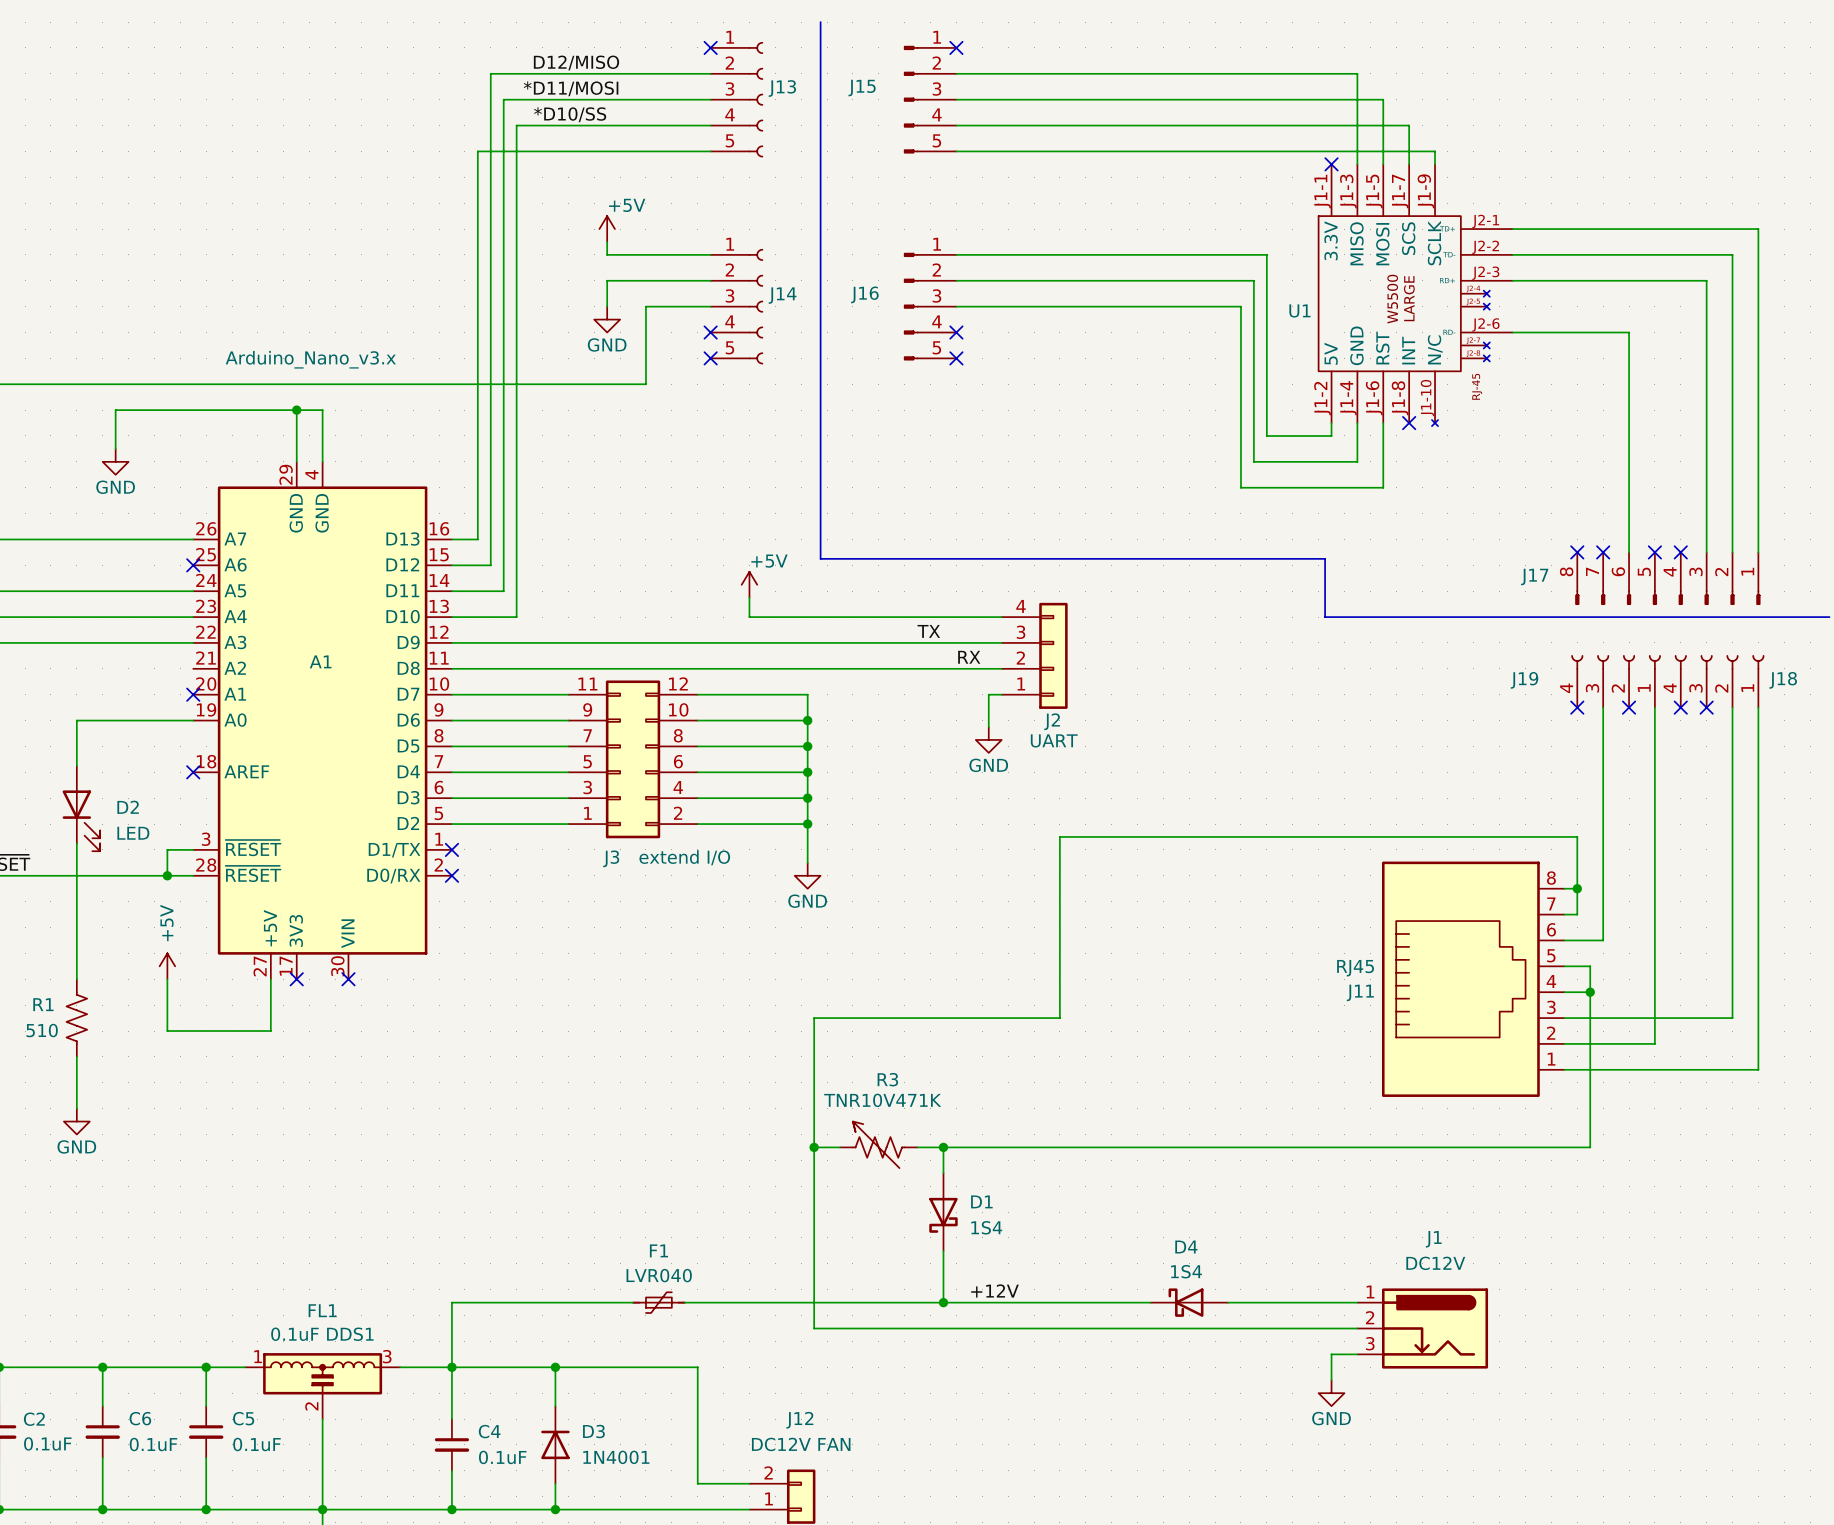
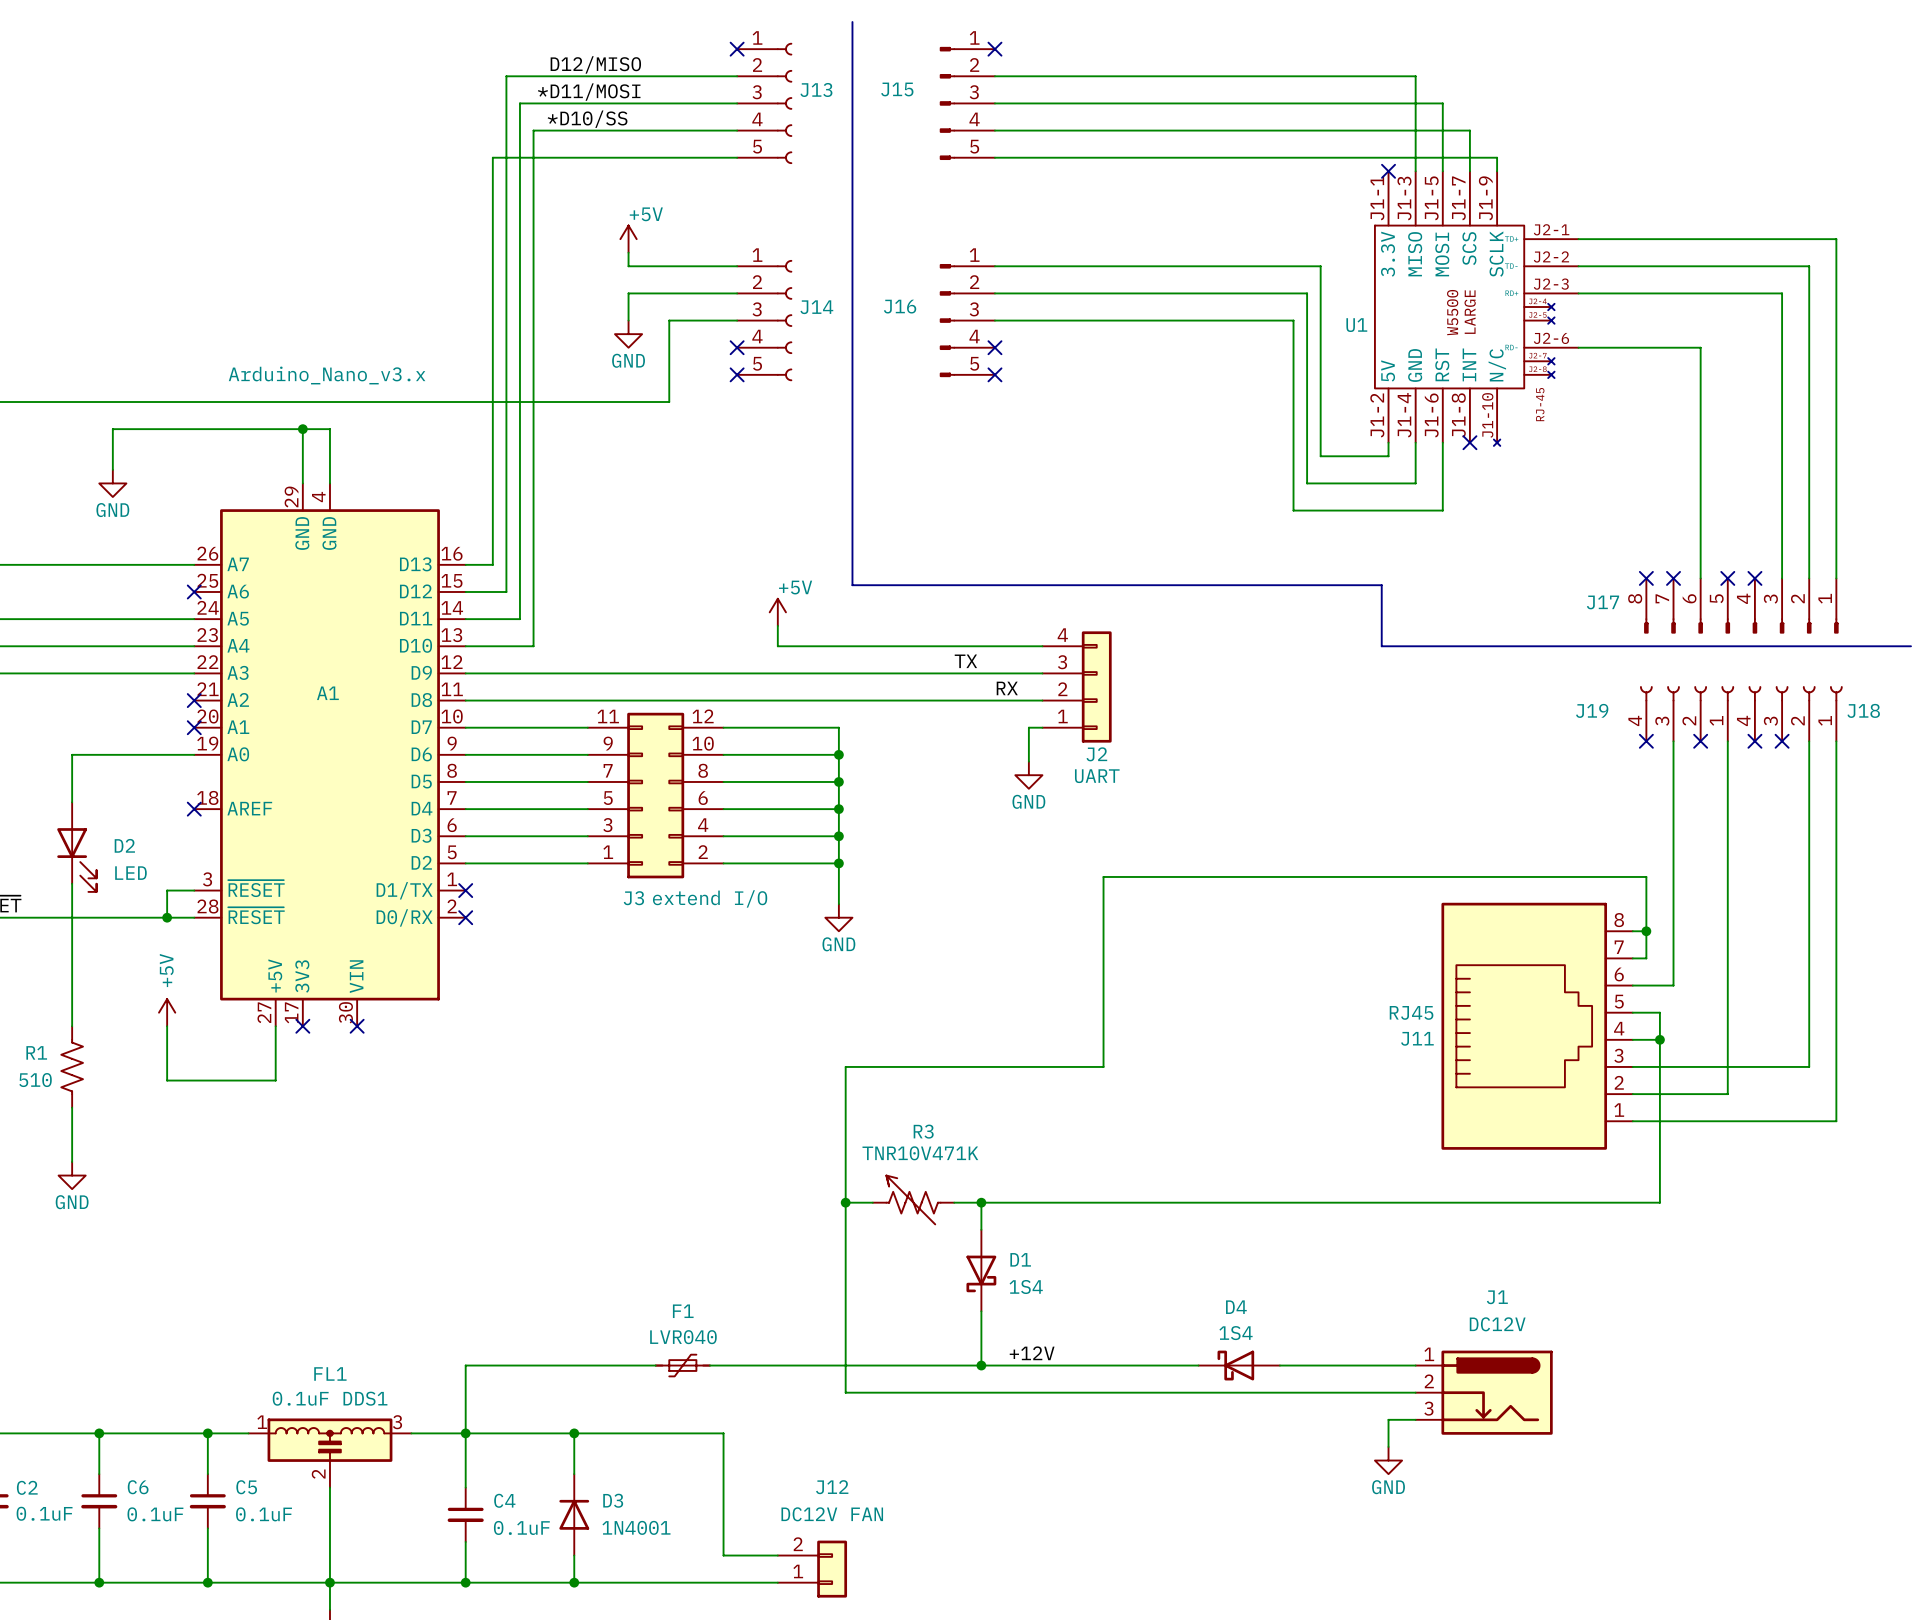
no-connect mark: none -> (194, 700)

